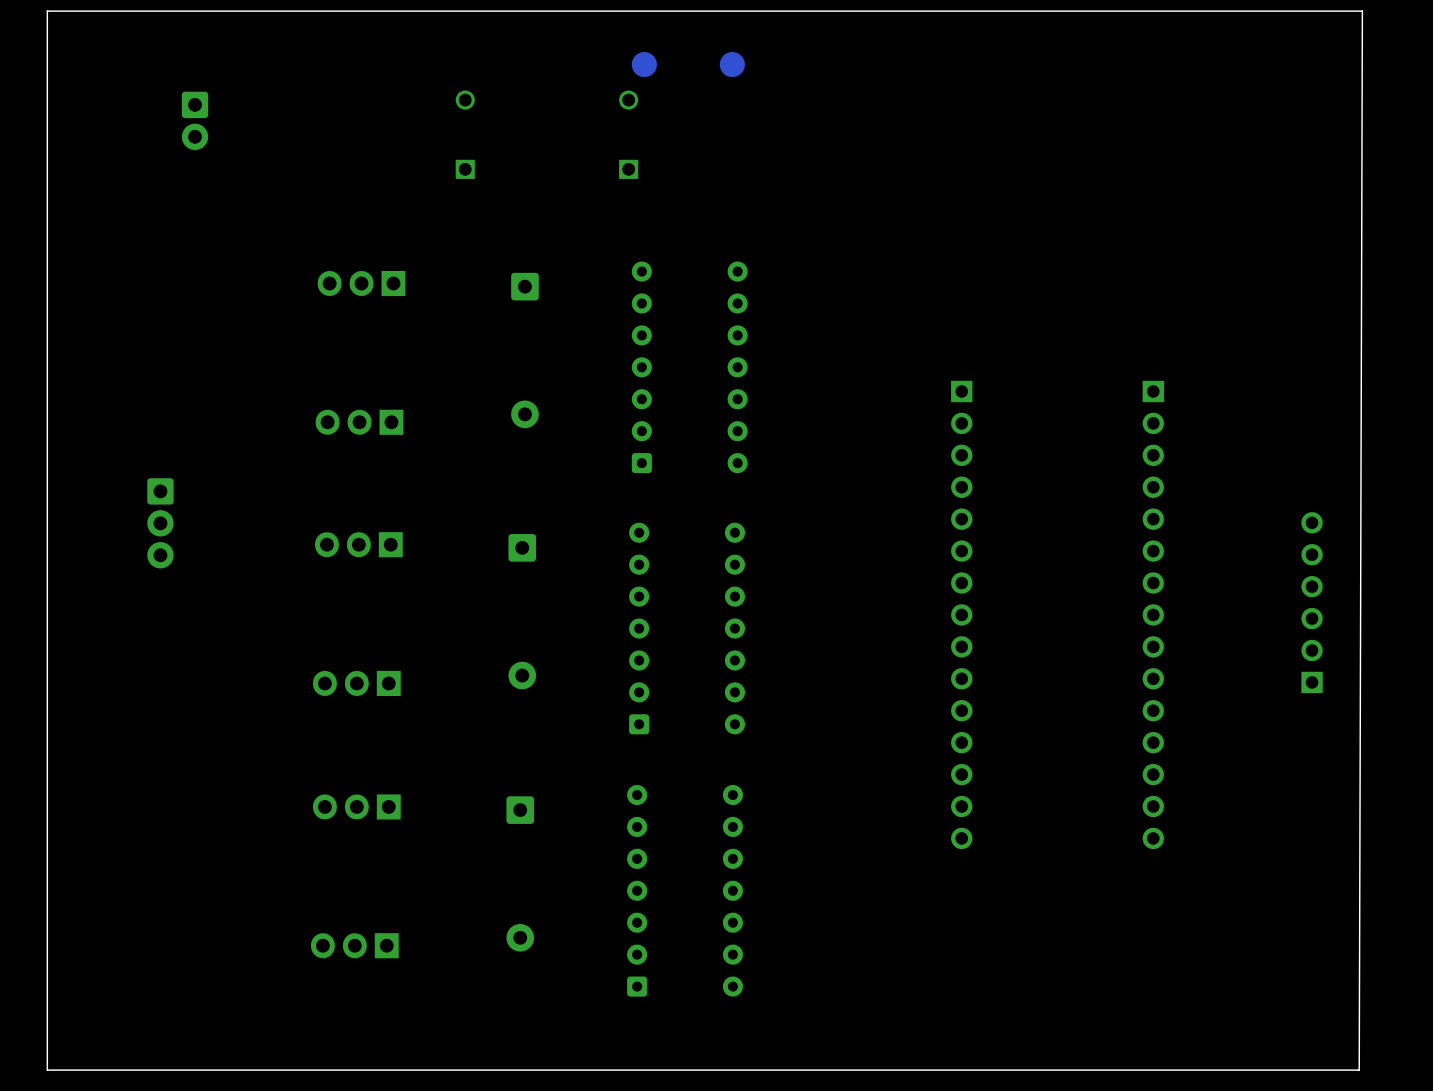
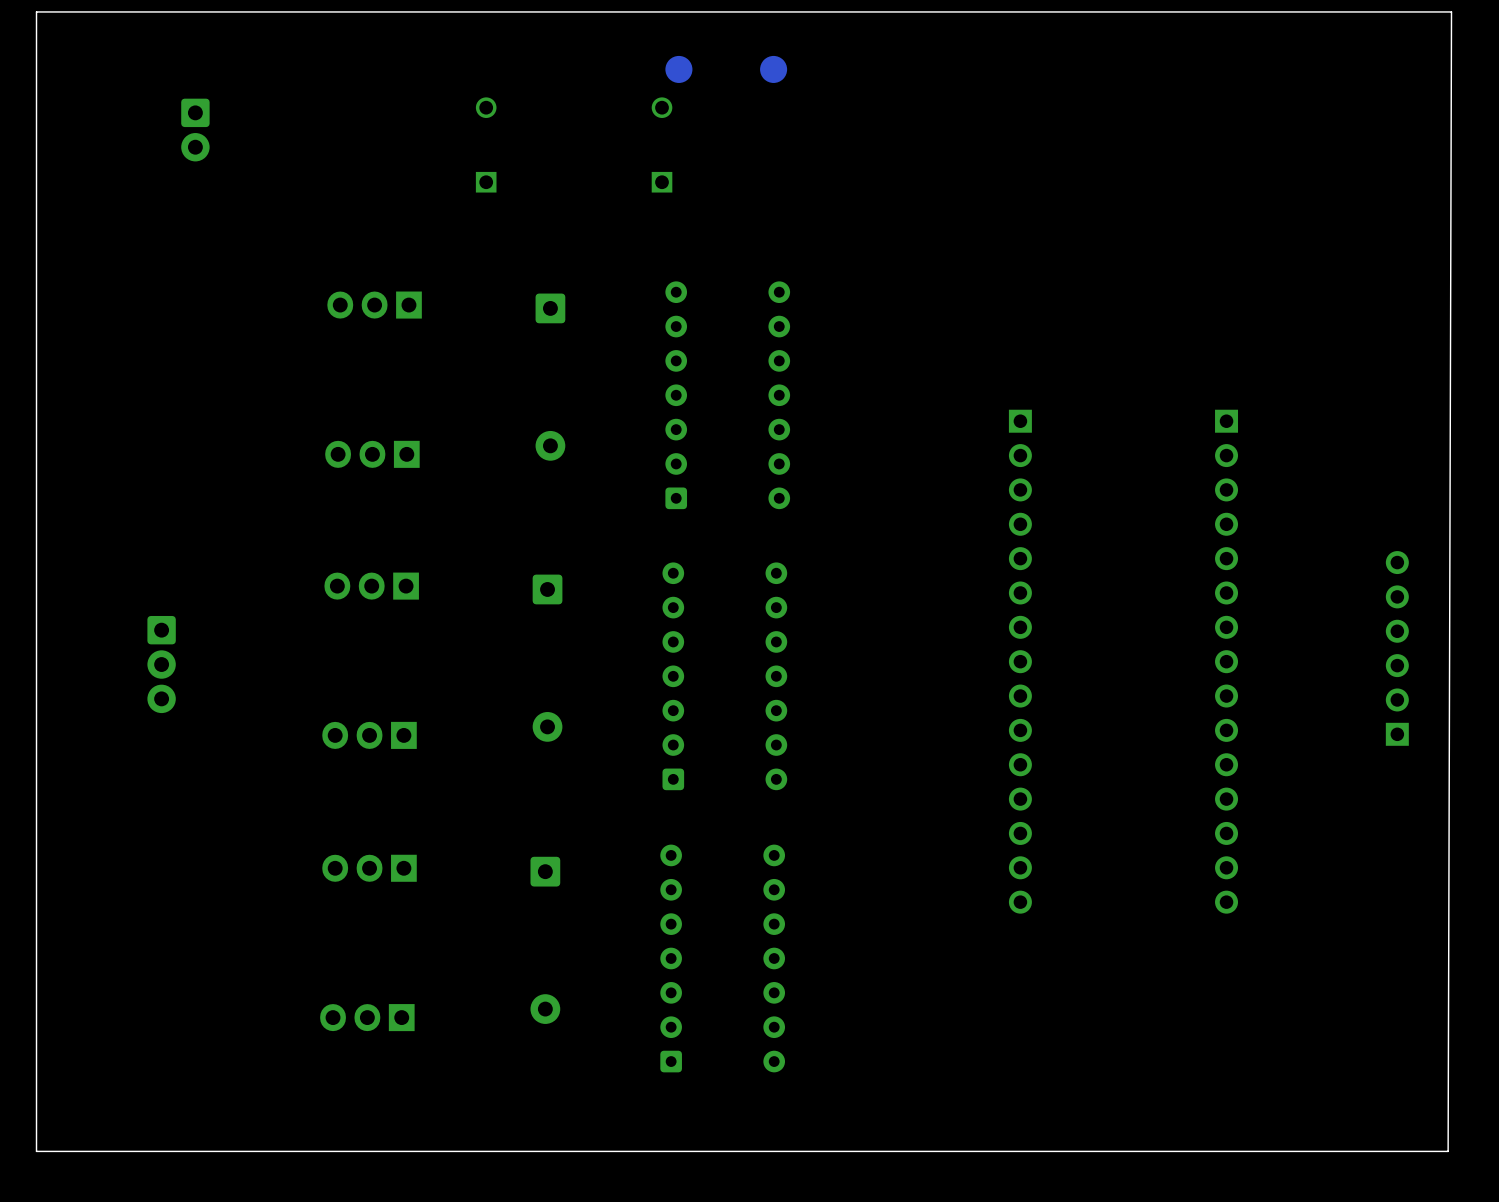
part position: (160, 523) -> (161, 664)

